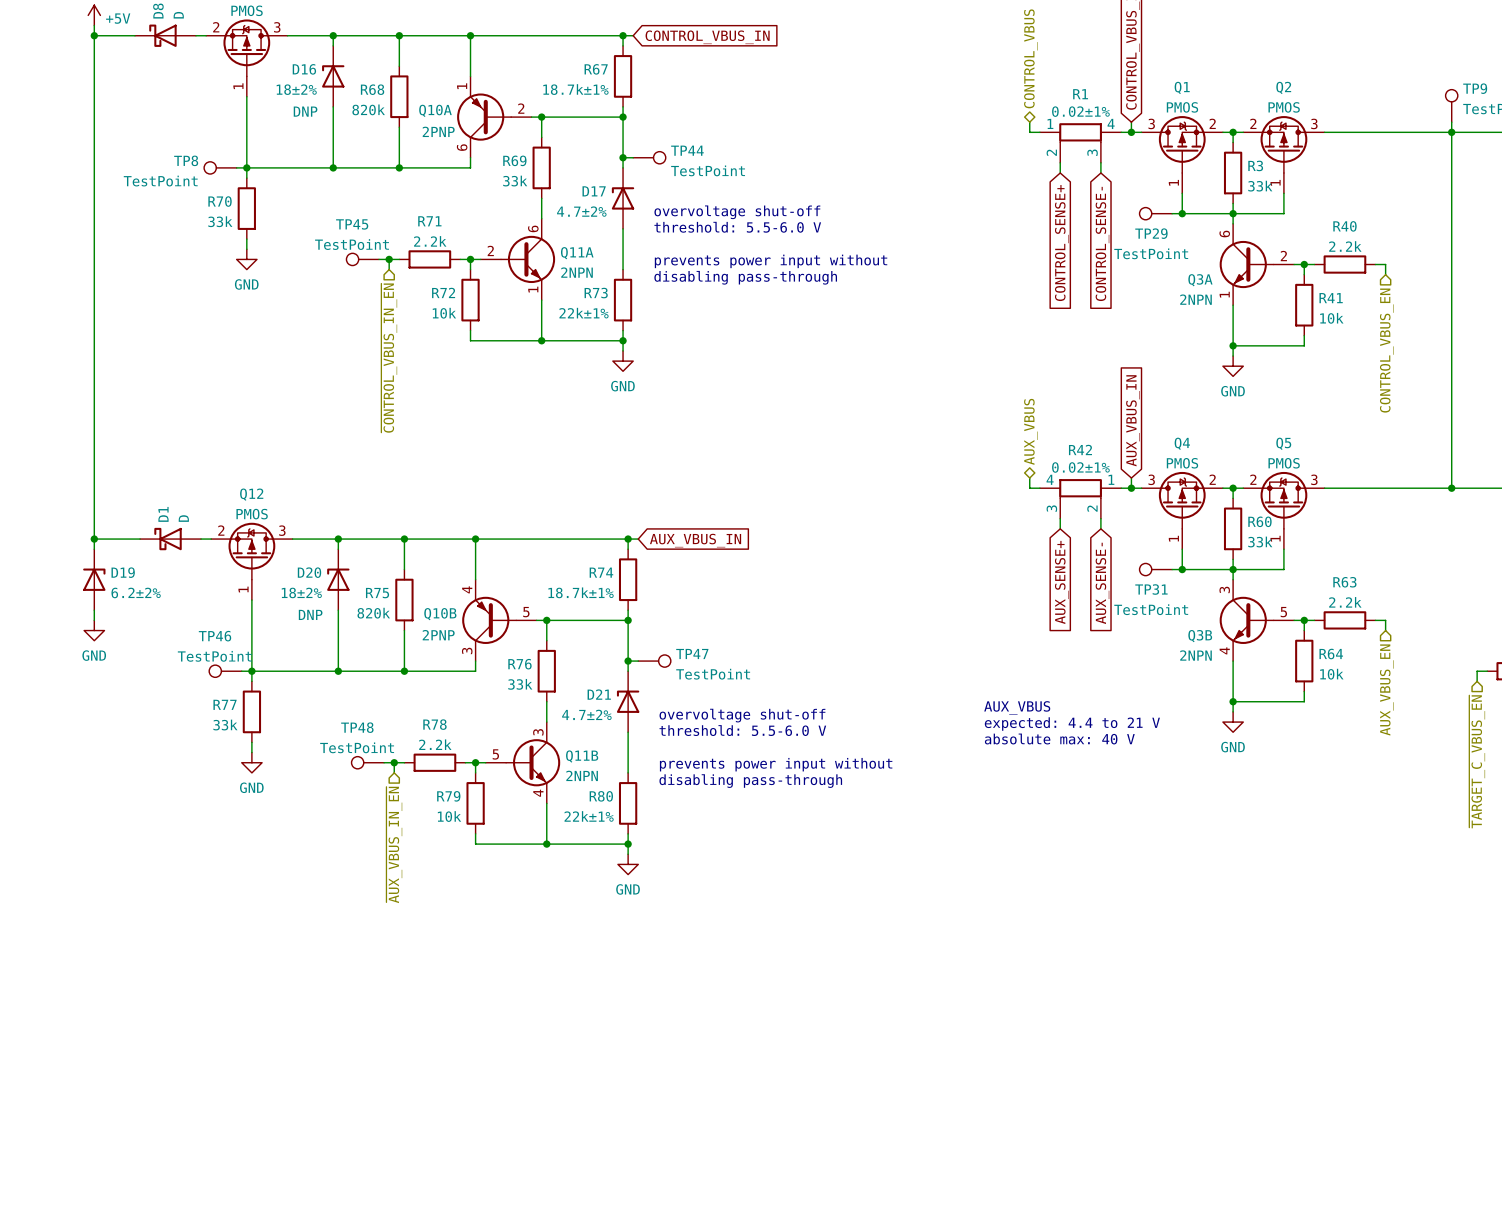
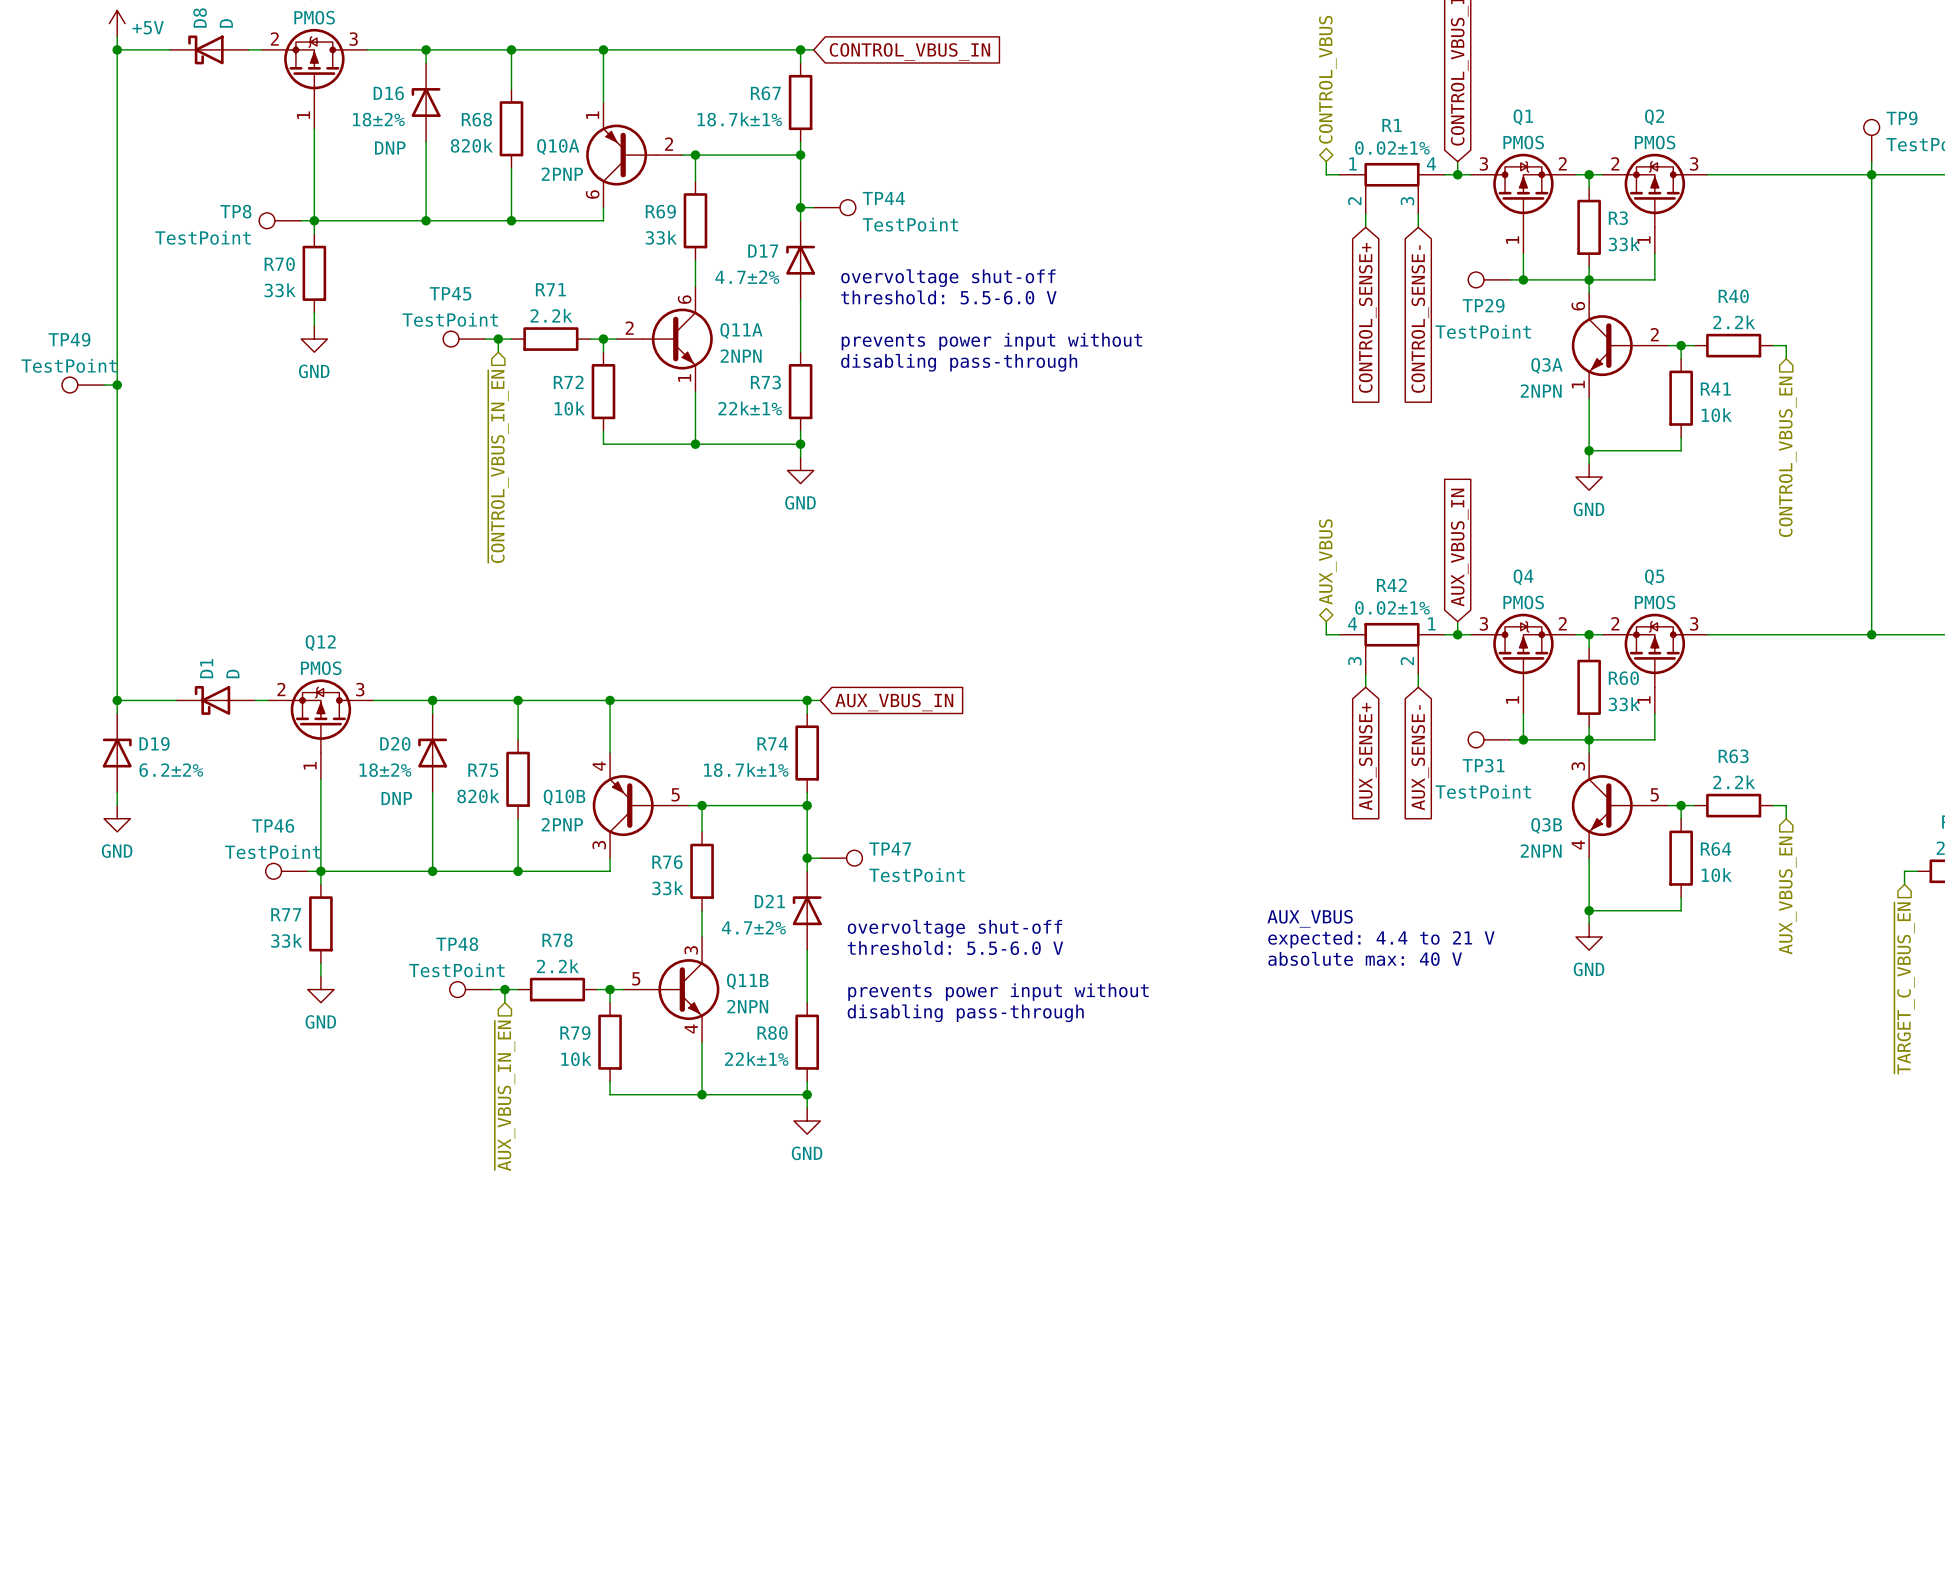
TP49: none -> TestPoint (83, 385)
wire: none -> (104, 385) (117, 385)
junction: none -> (117, 385)

